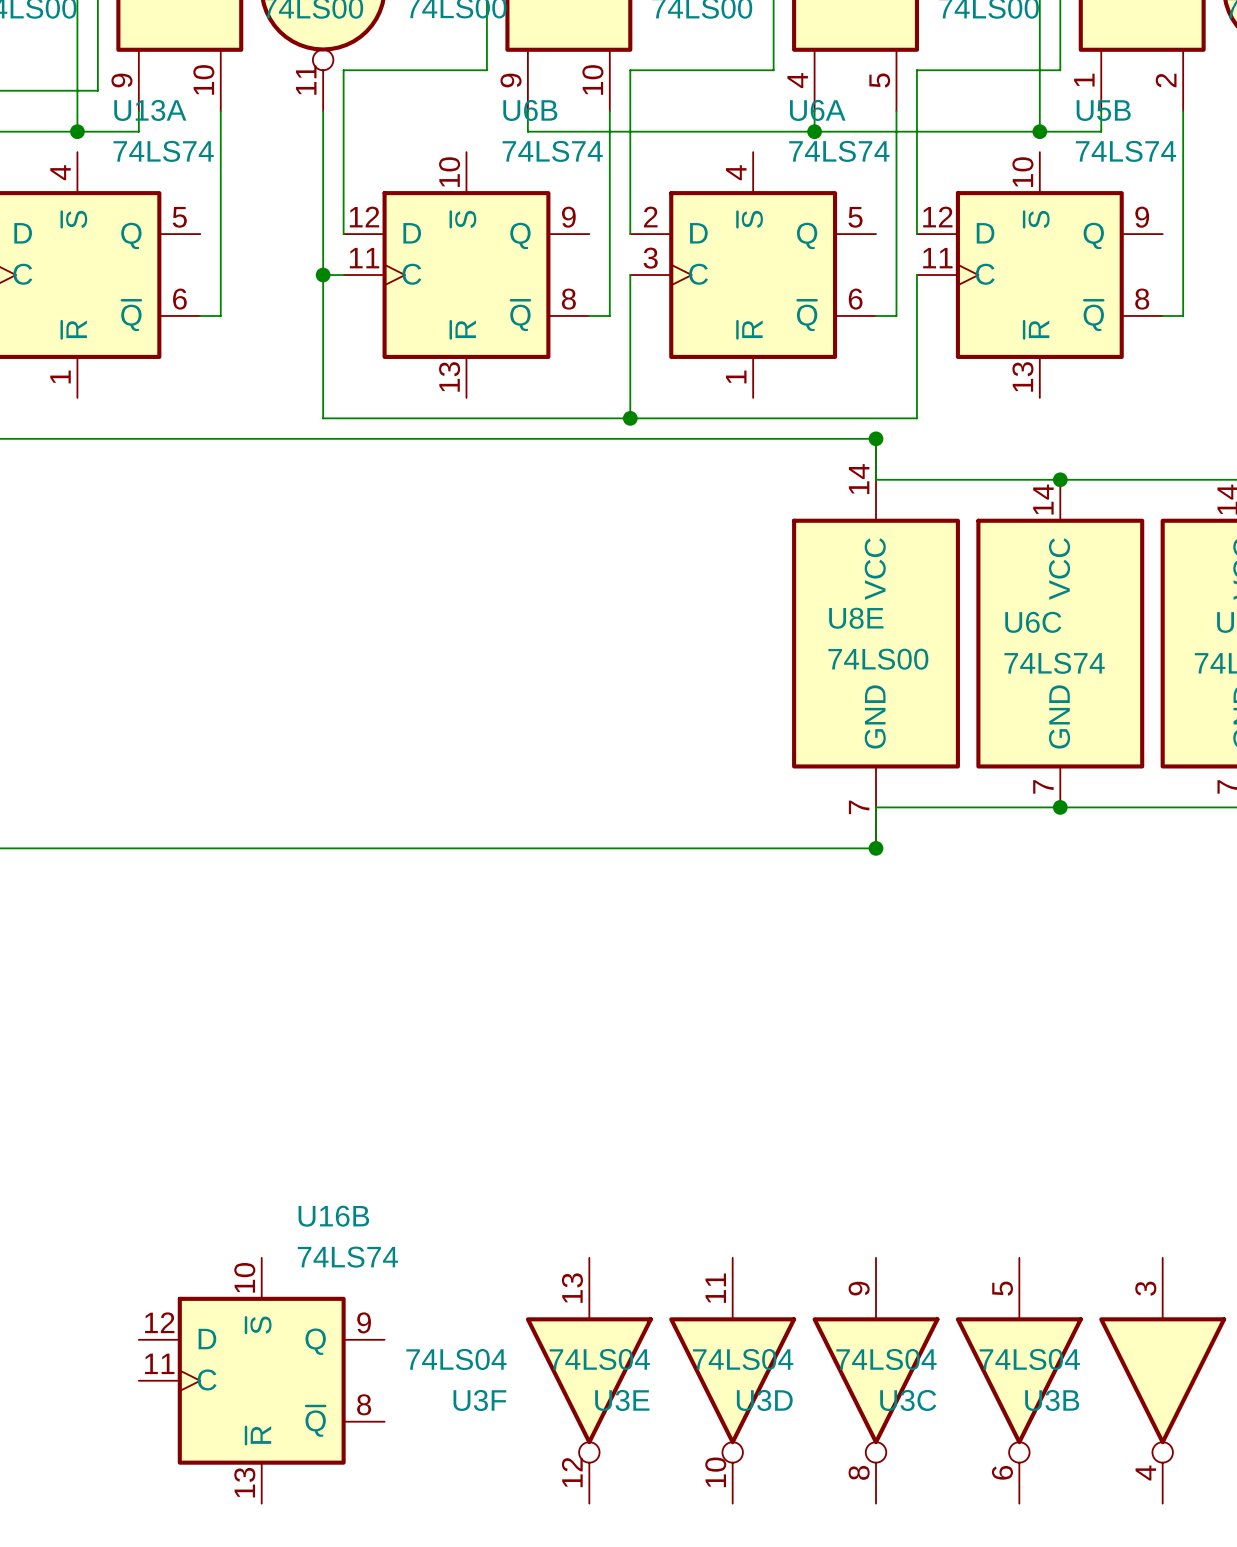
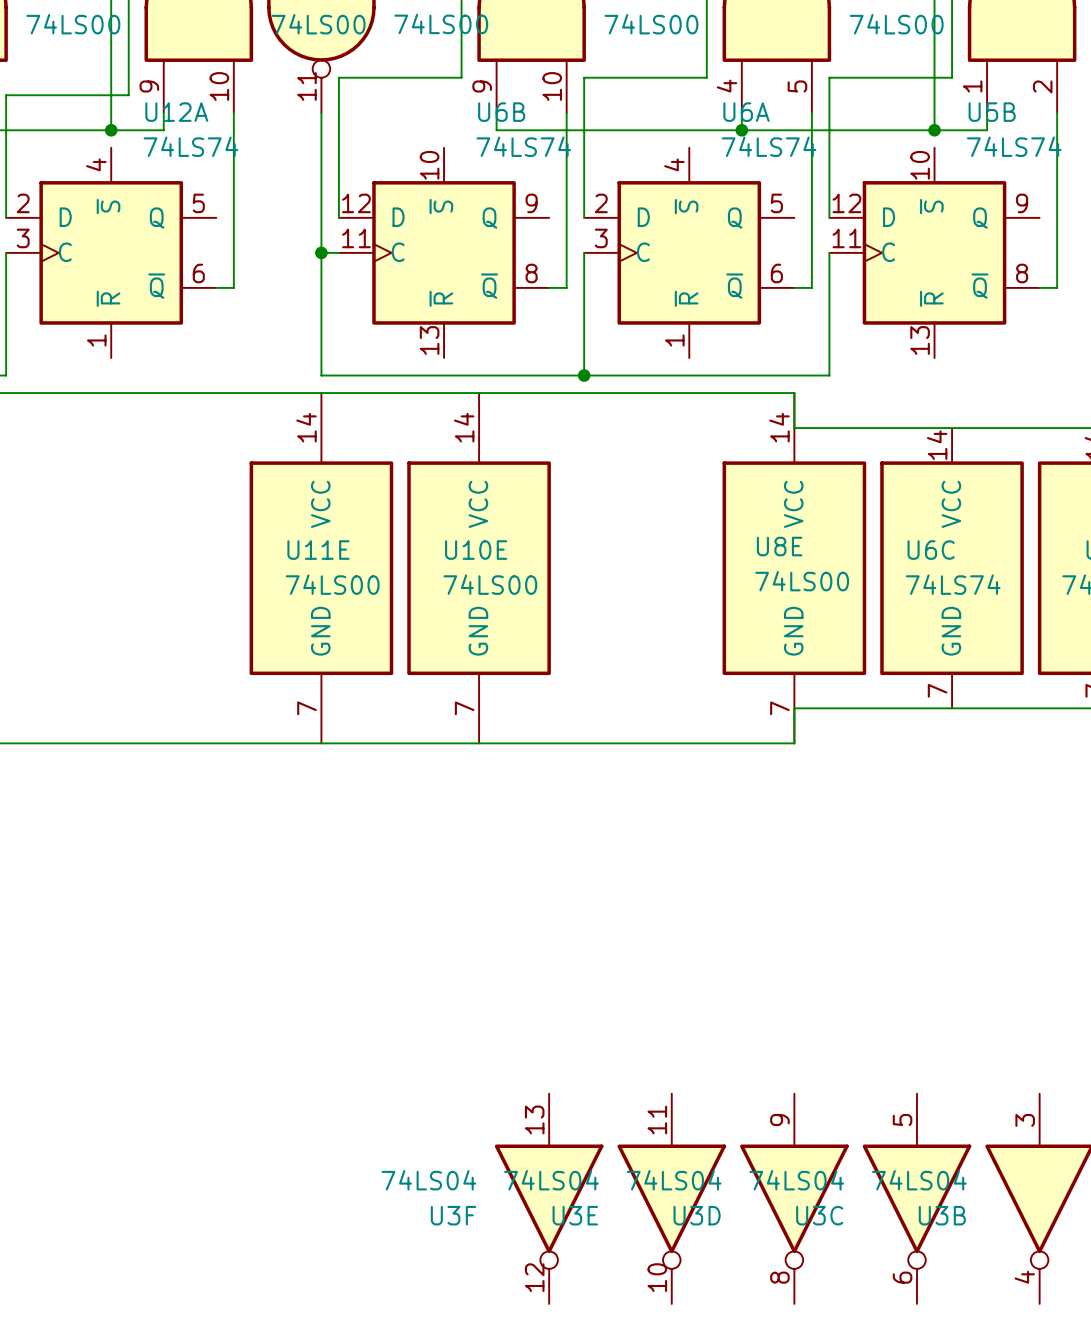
U13A name: U13A (150, 110) -> U12A (176, 112)
junction: (876, 438) -> none
junction: (1060, 479) -> none
U11E: none -> 74LS00 (321, 568)
U10E: none -> 74LS00 (479, 568)
junction: (1060, 807) -> none
junction: (876, 848) -> none
U16B: 74LS74 (261, 1380) -> none

